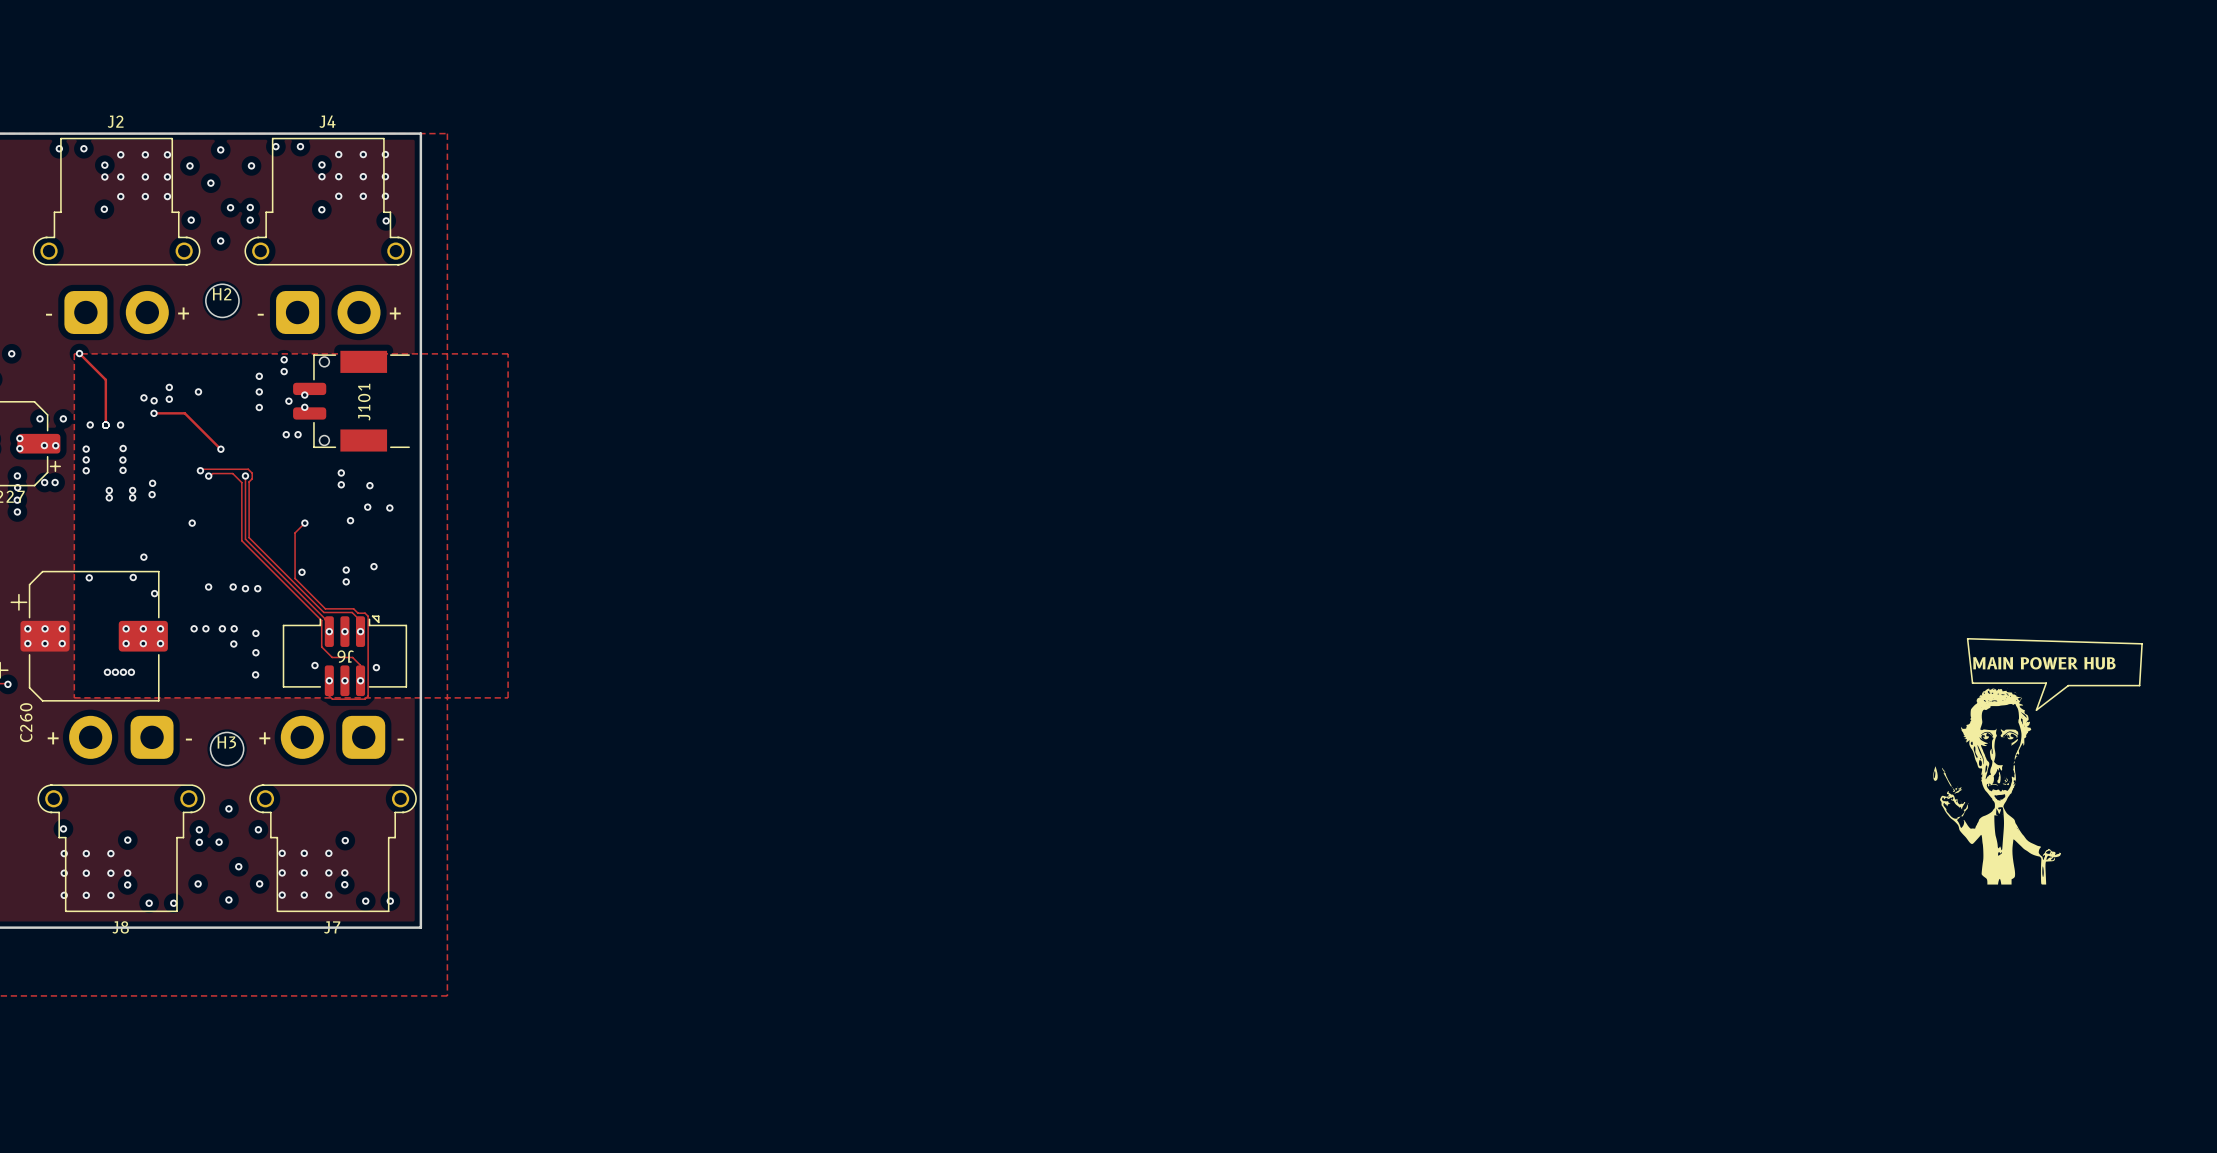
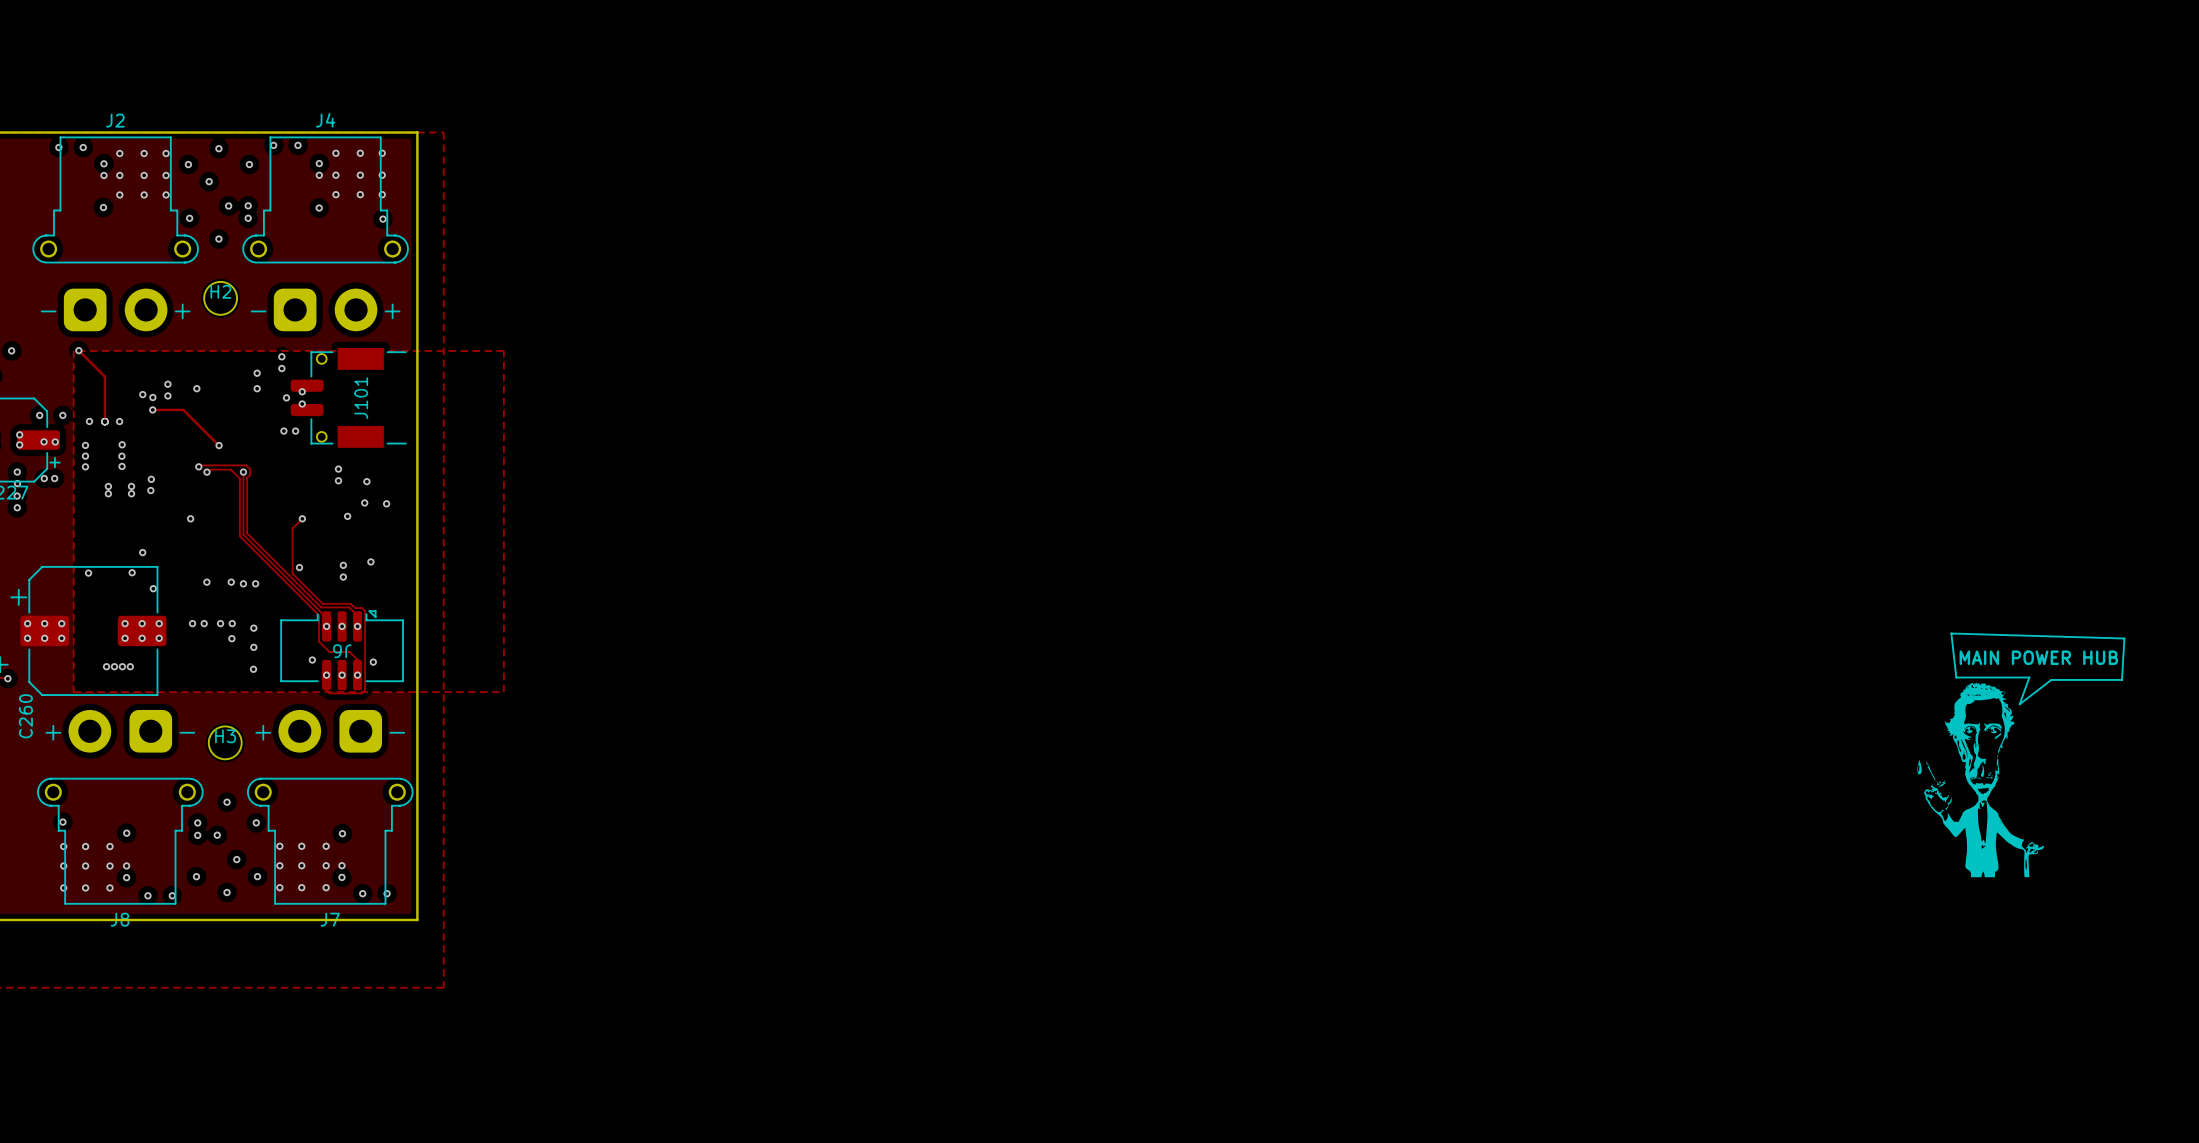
via: (259, 407) -> none

